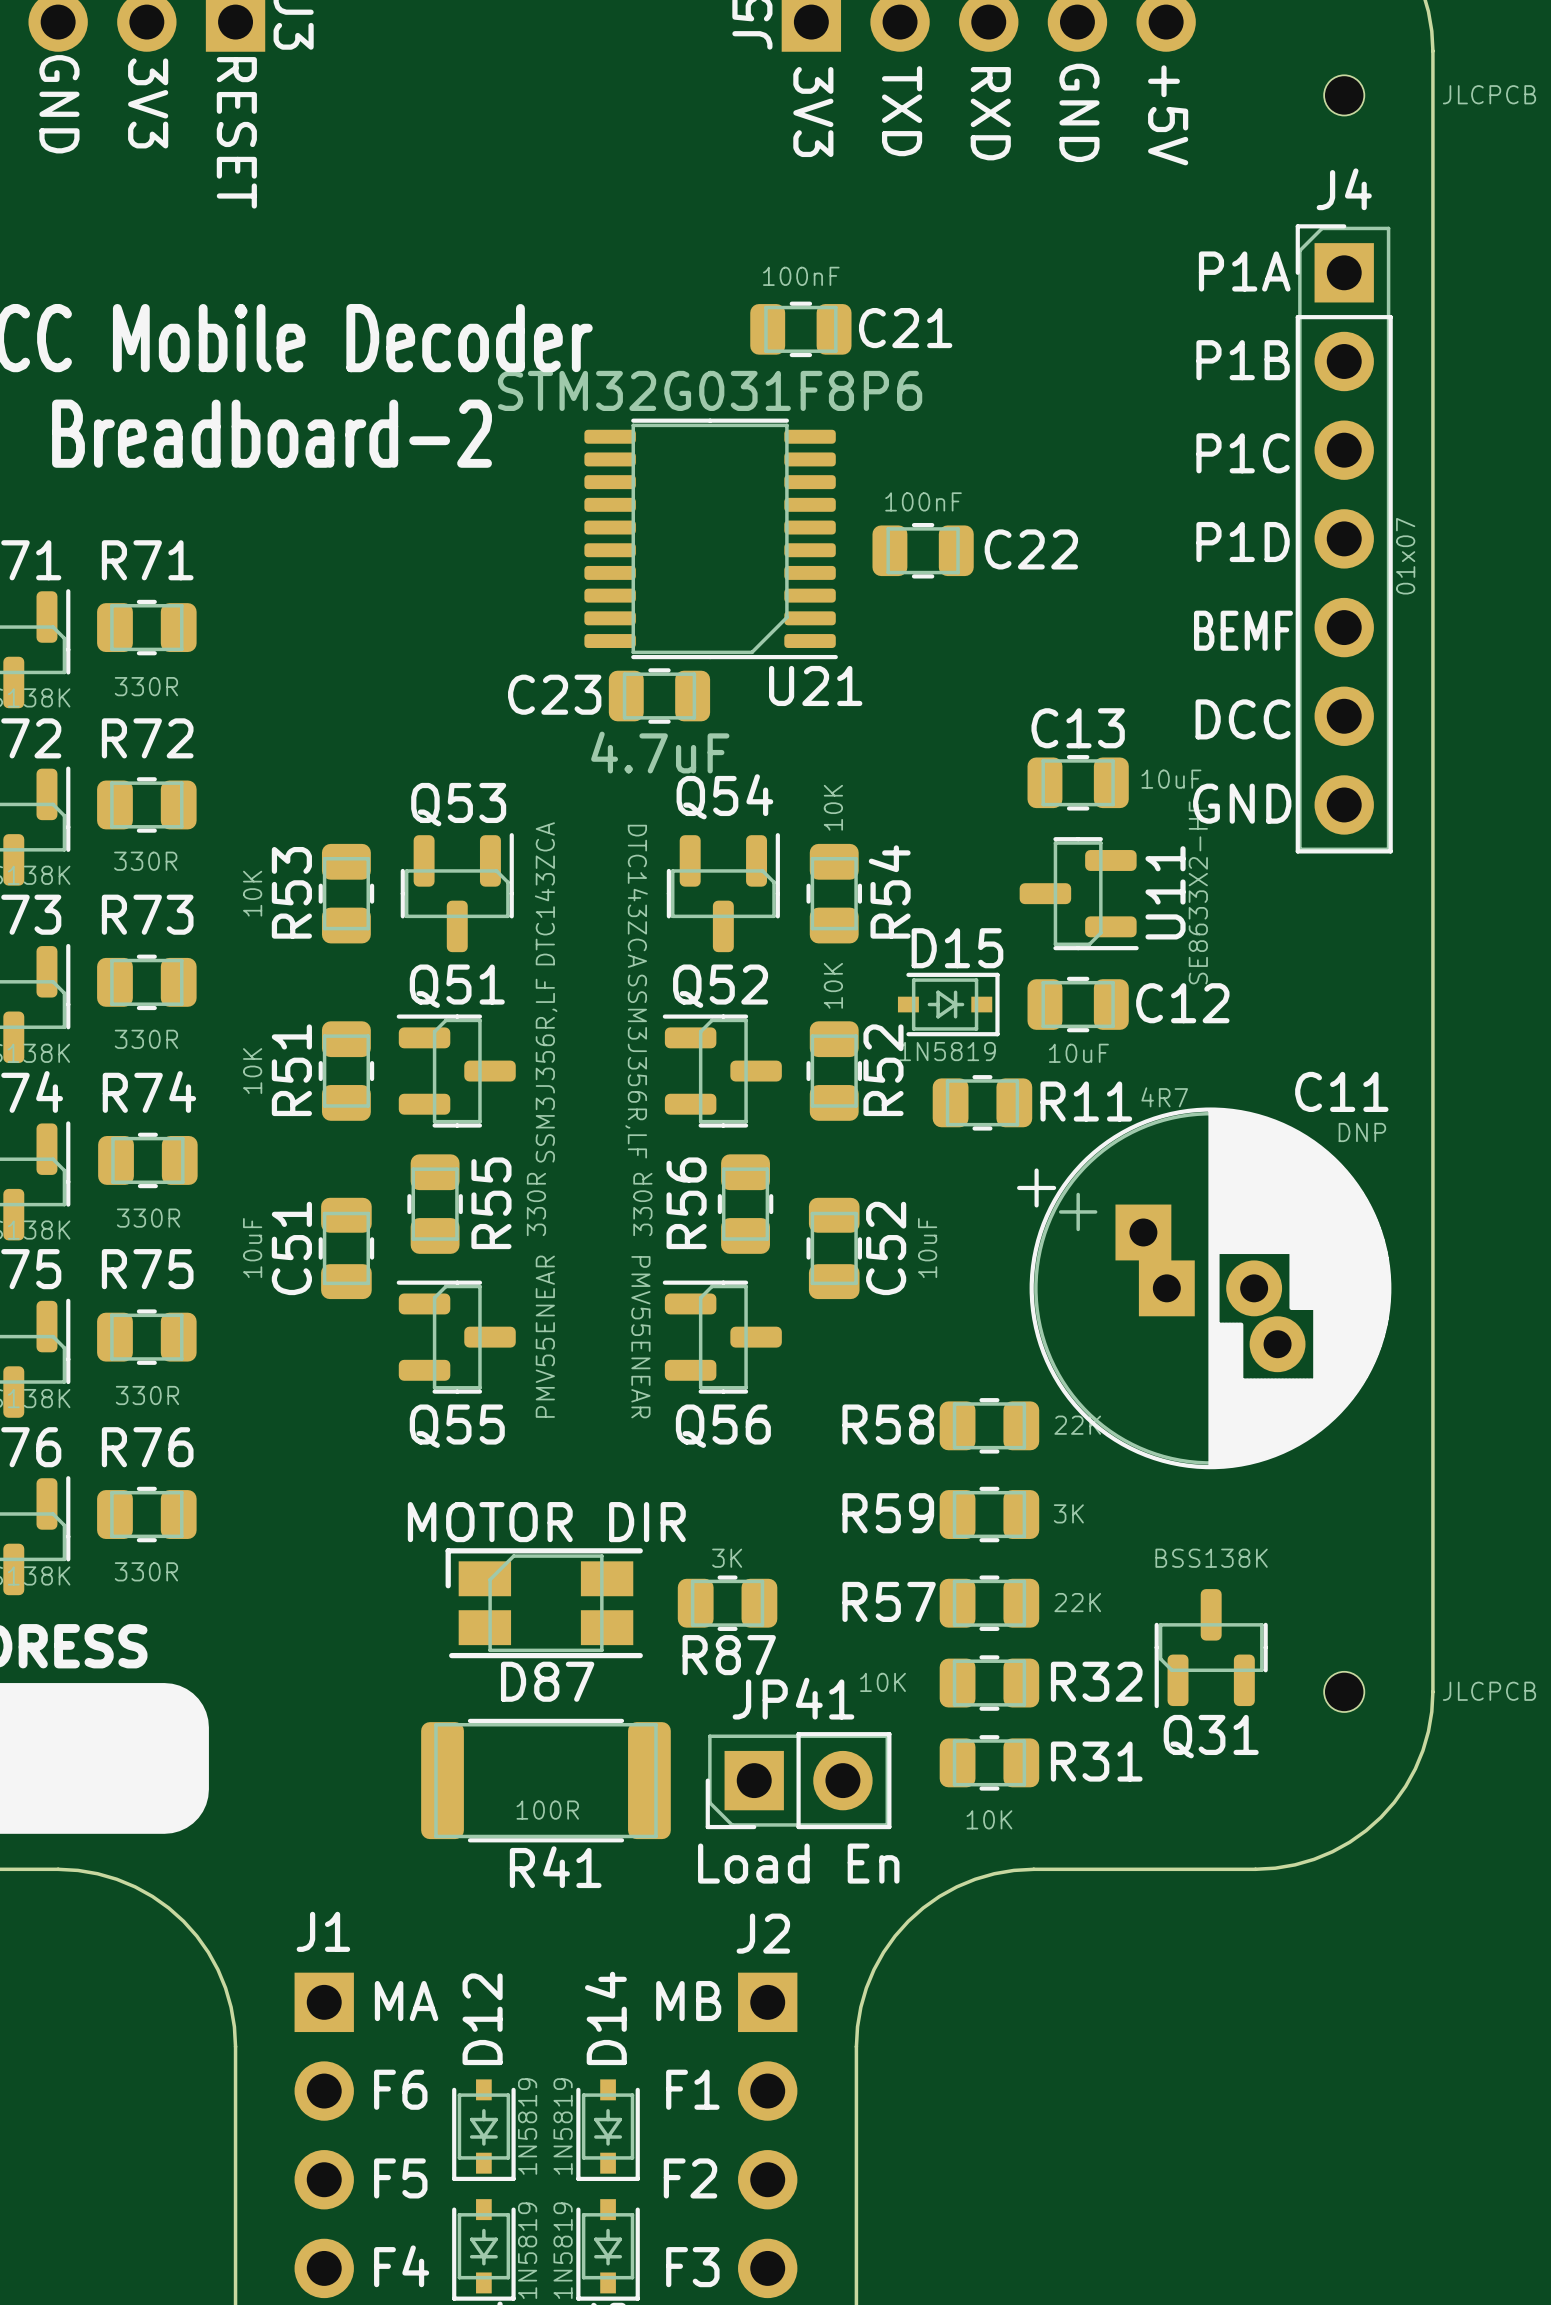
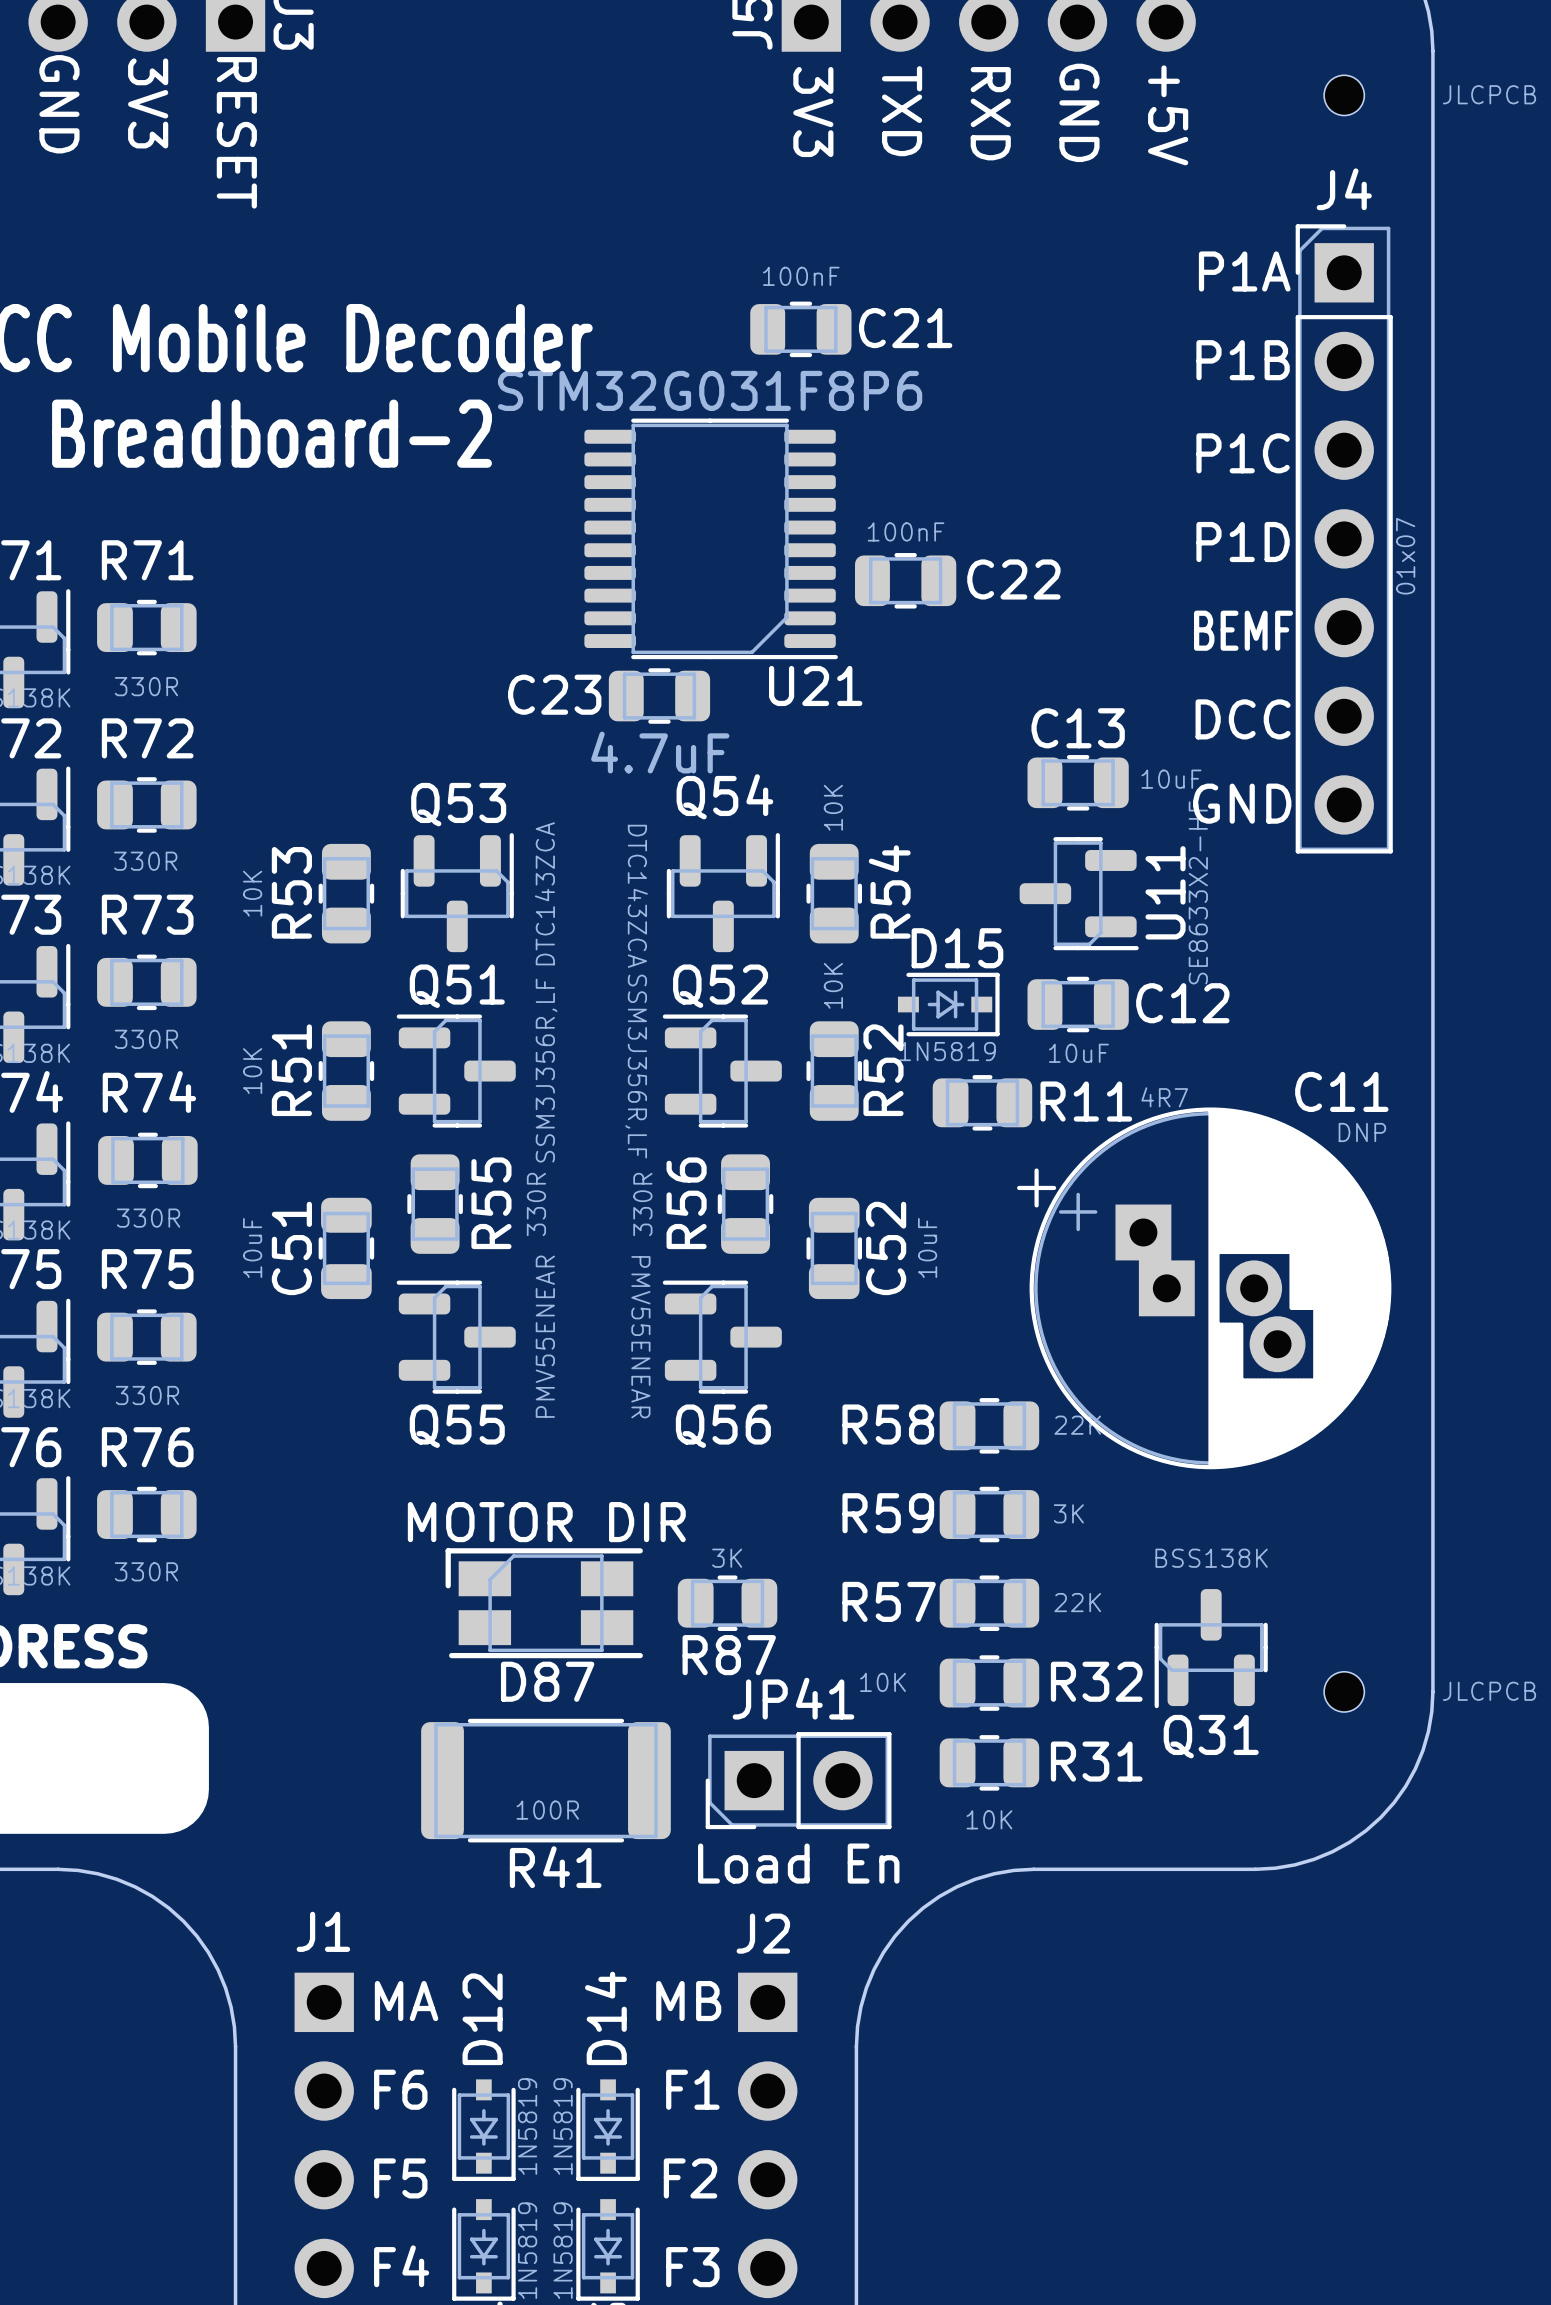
C22 position: (923, 550) -> (905, 580)

